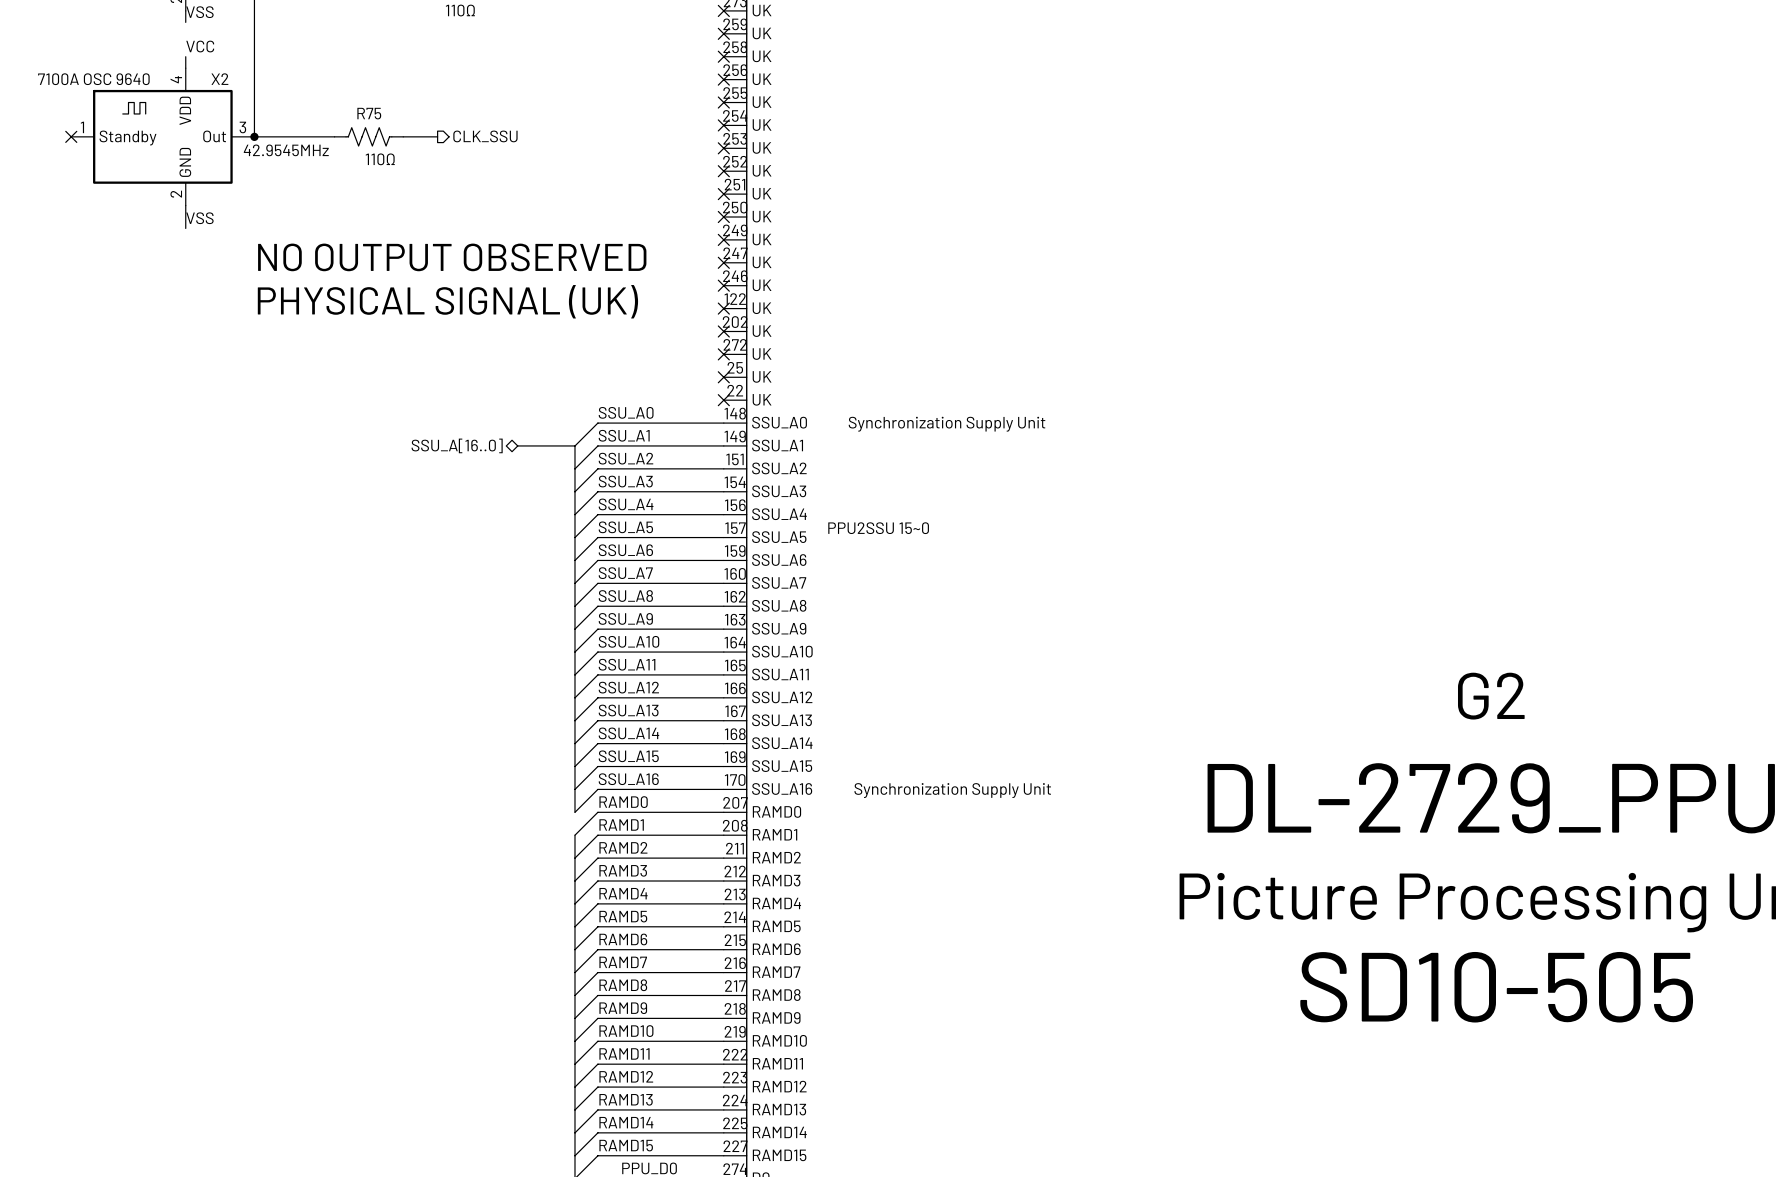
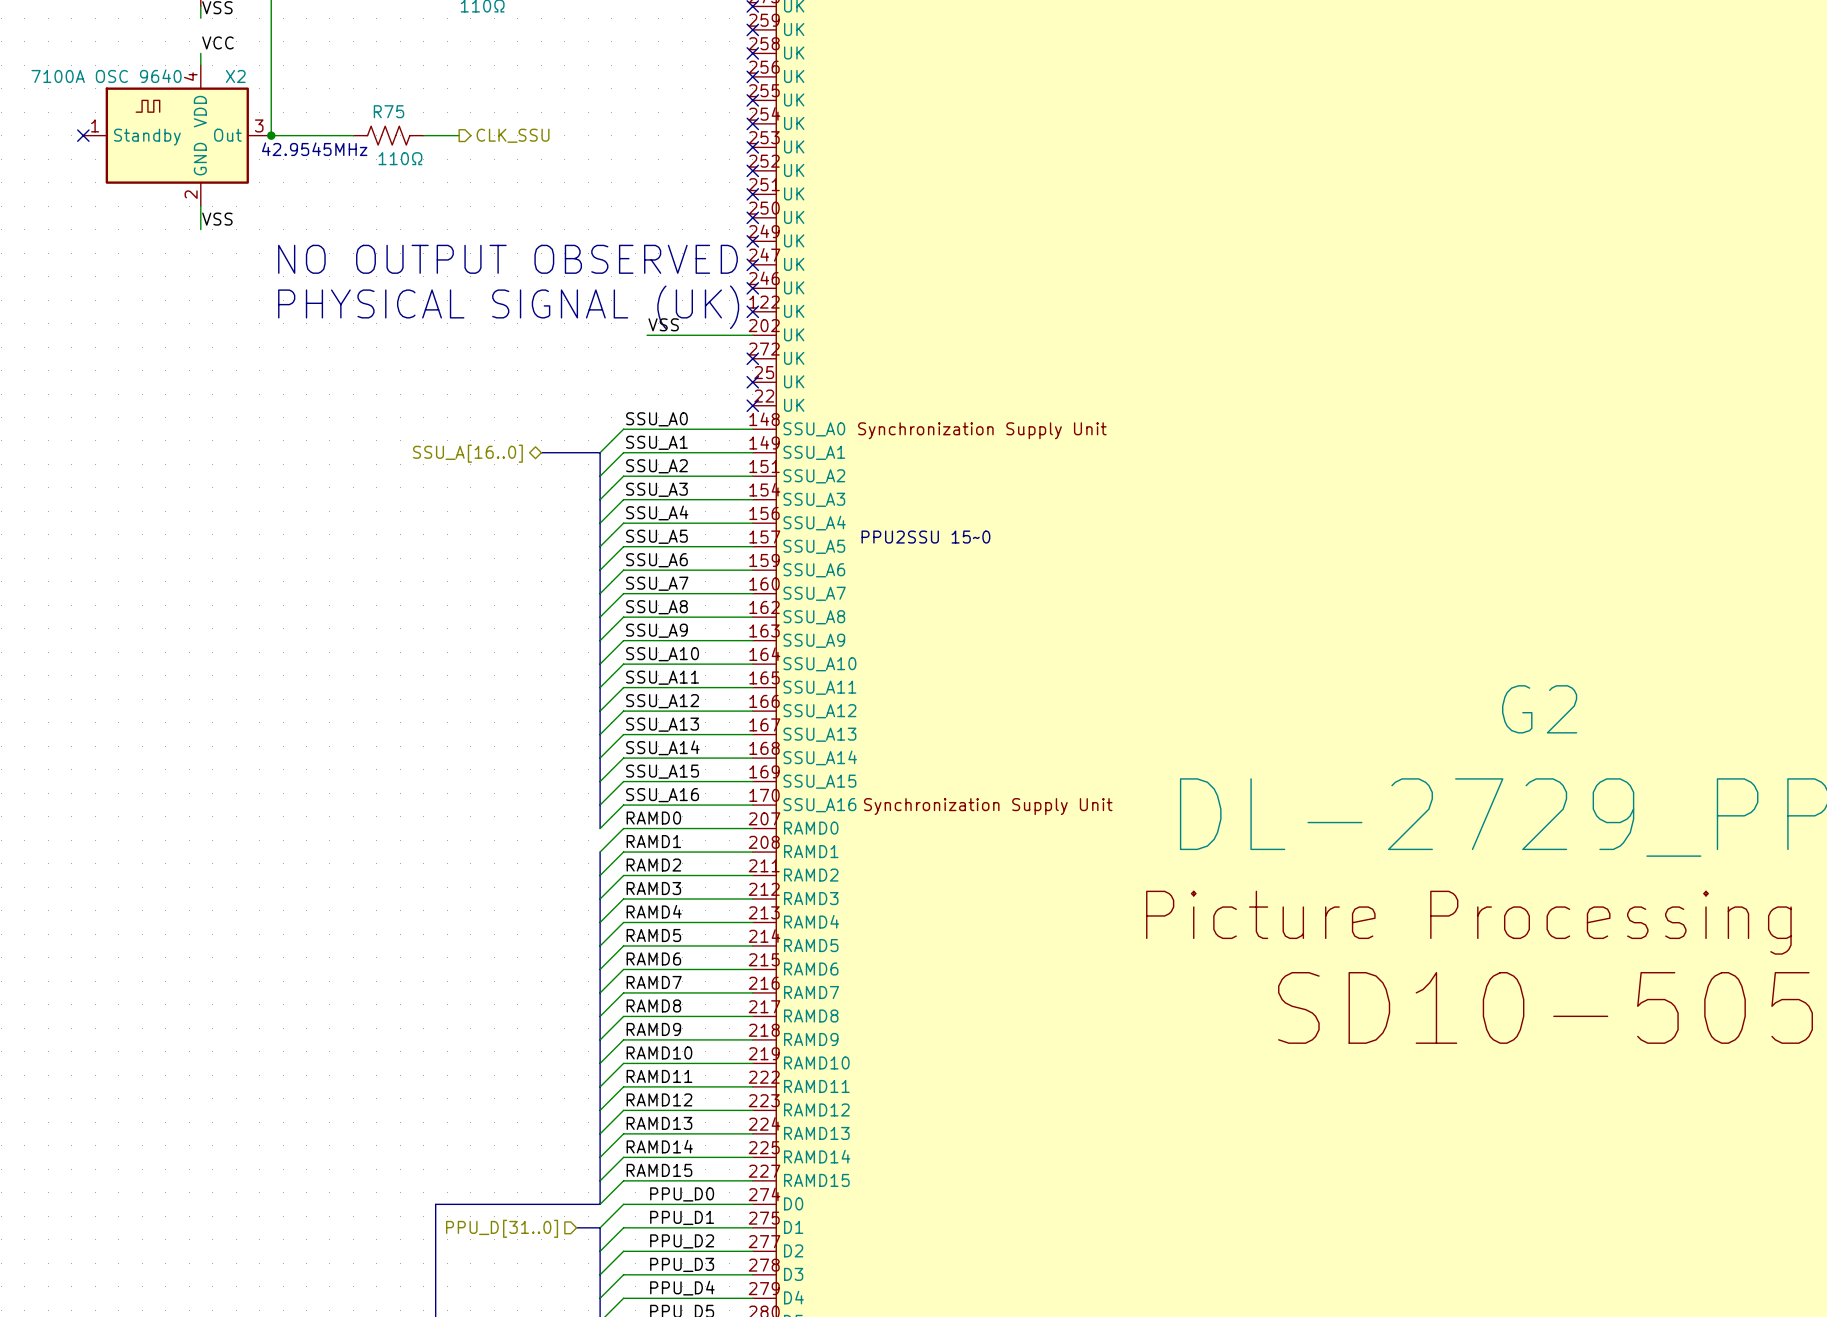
label: none -> VSS (663, 324)
wire: none -> (647, 335) (752, 335)
no-connect mark: (723, 331) -> none

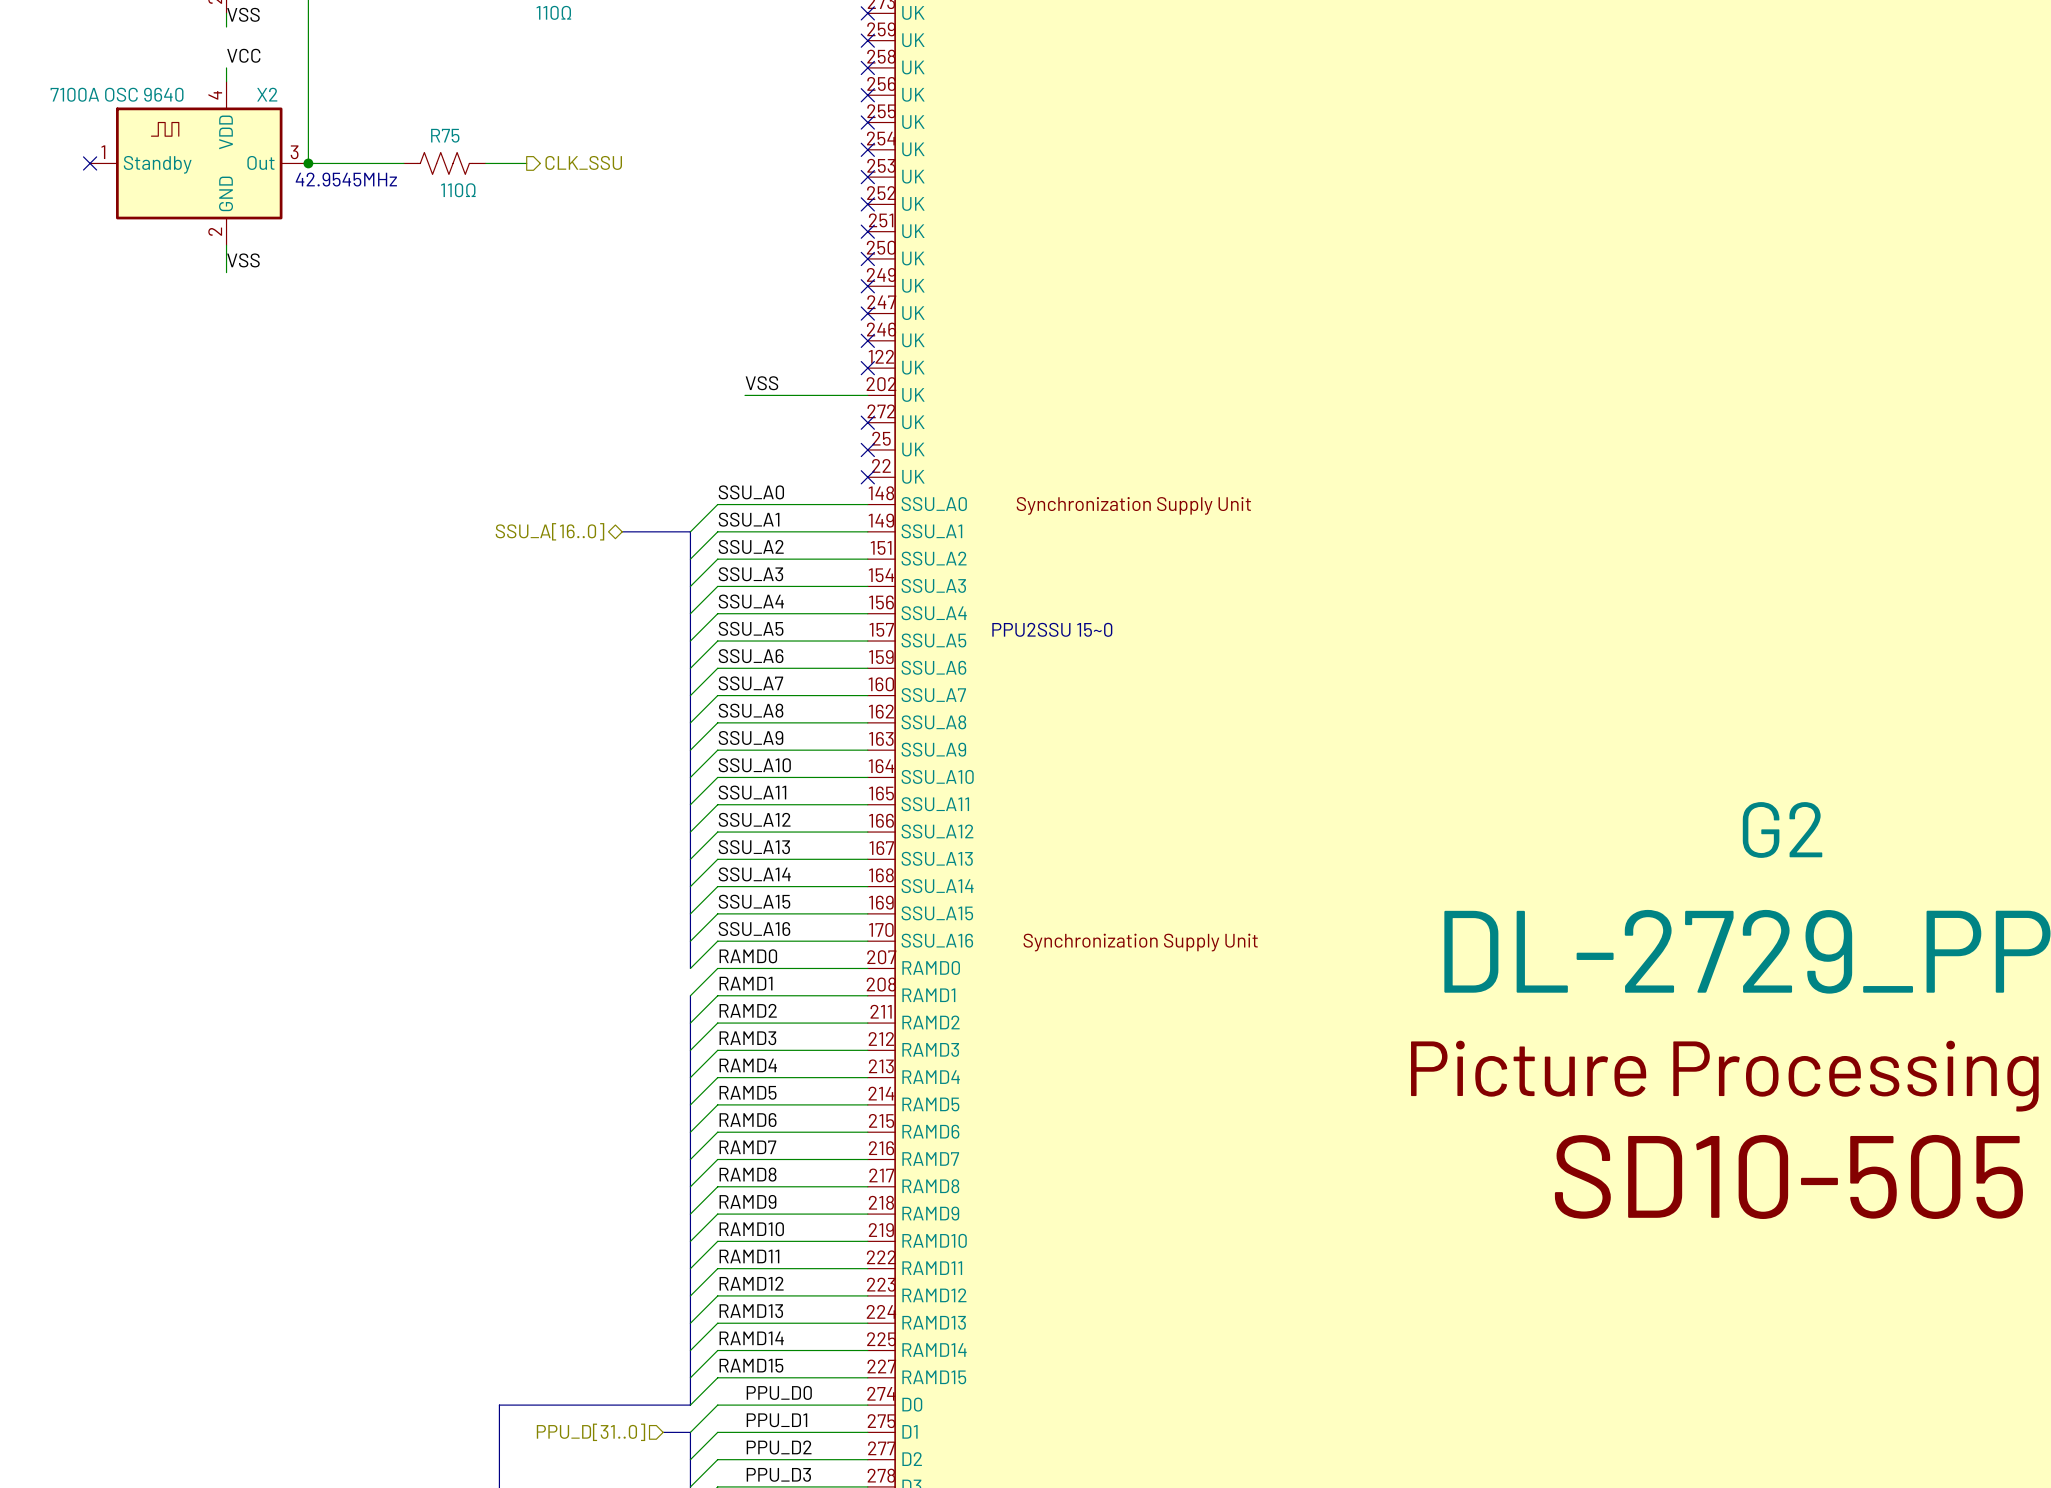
text: NO OUTPUT OBSERVED (507, 259) -> none
text: PHYSICAL SIGNAL (UK) (508, 307) -> none

